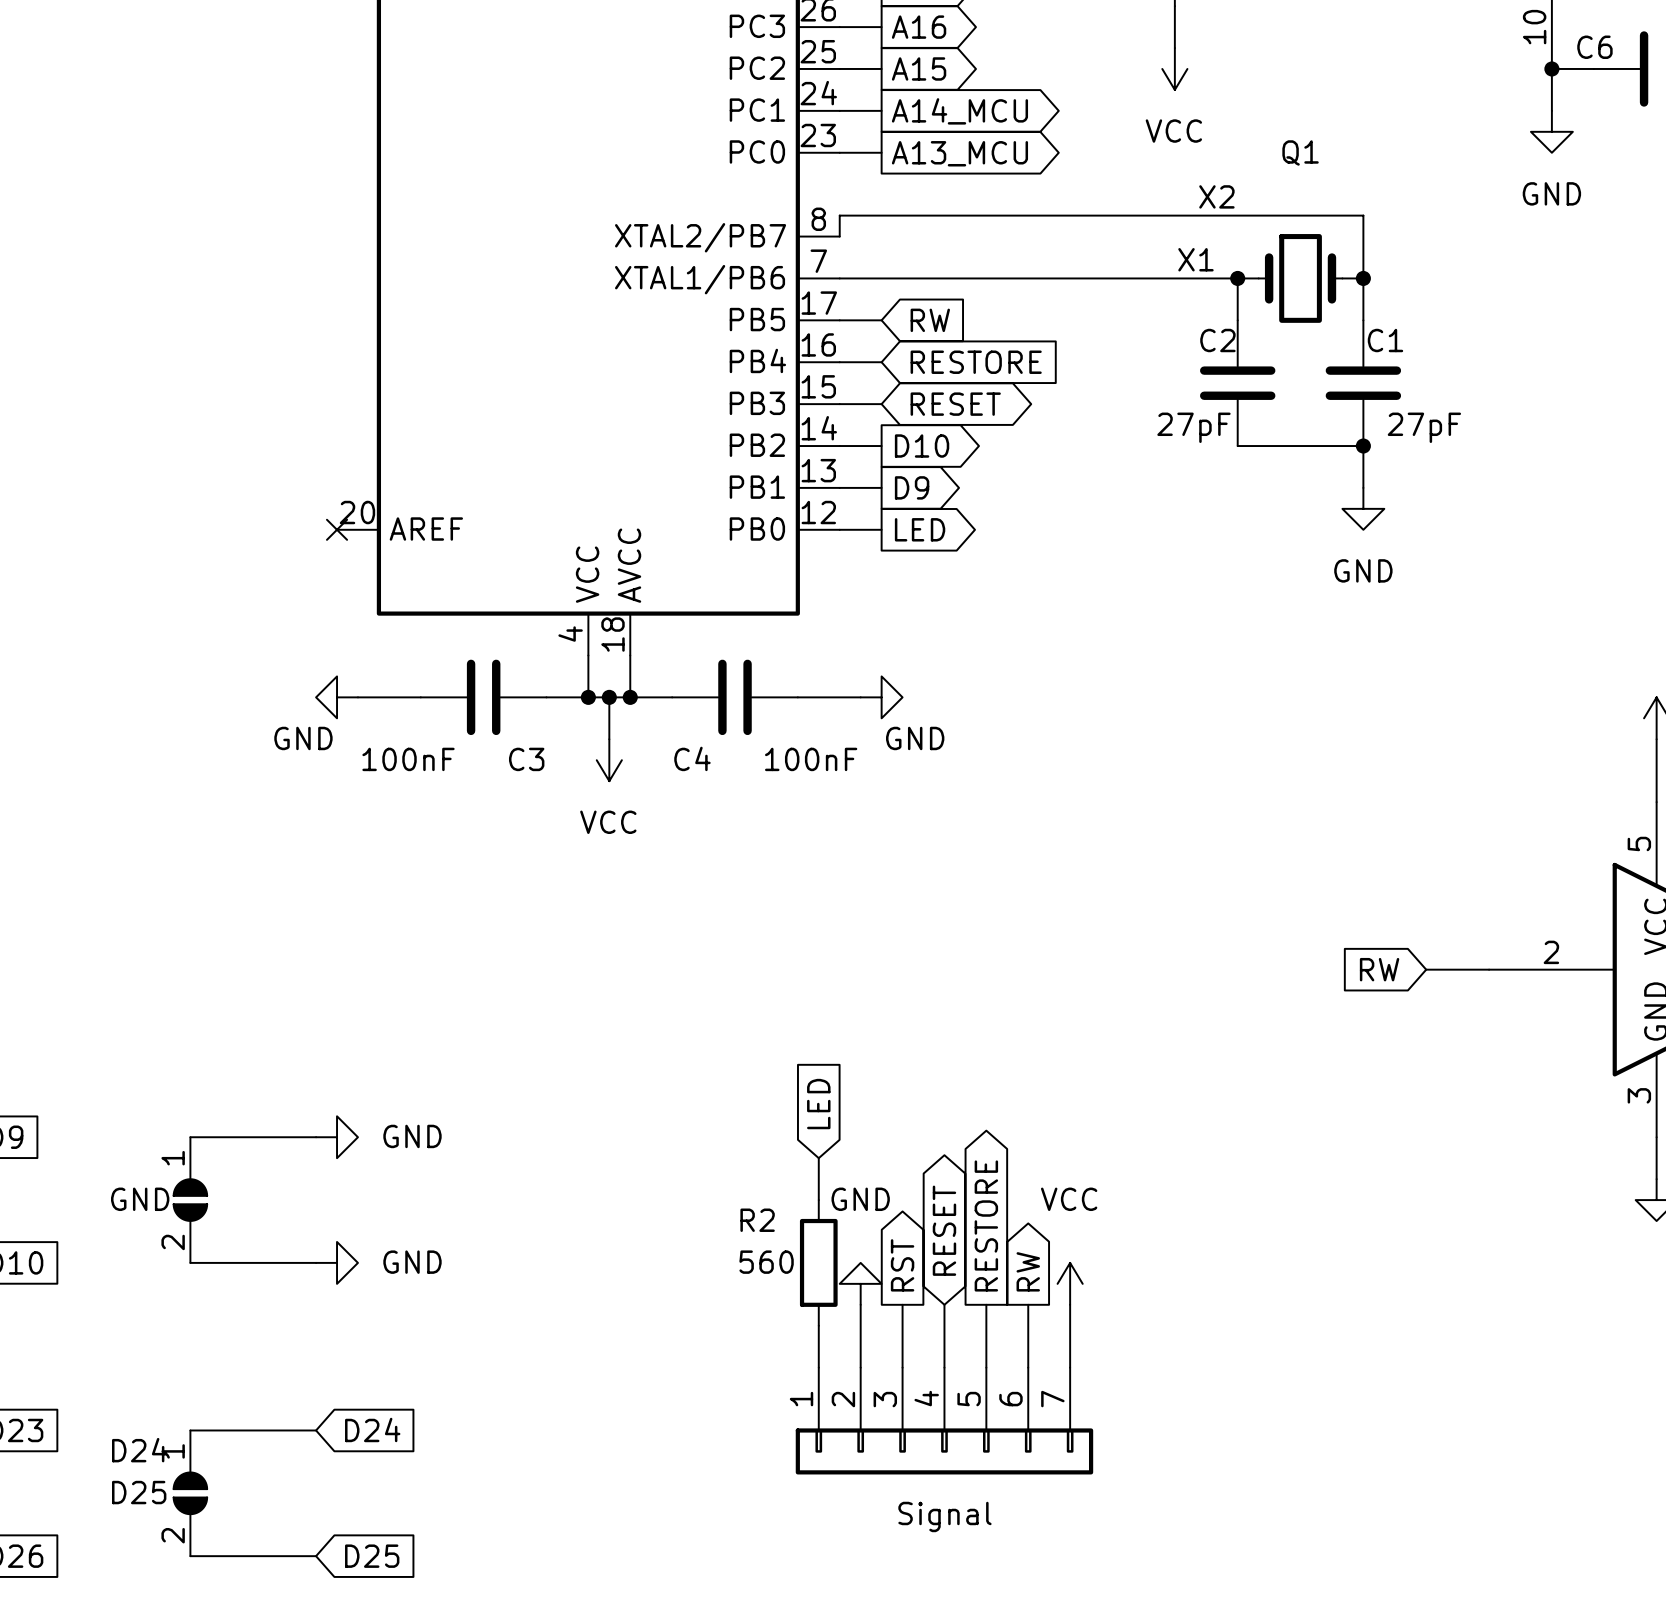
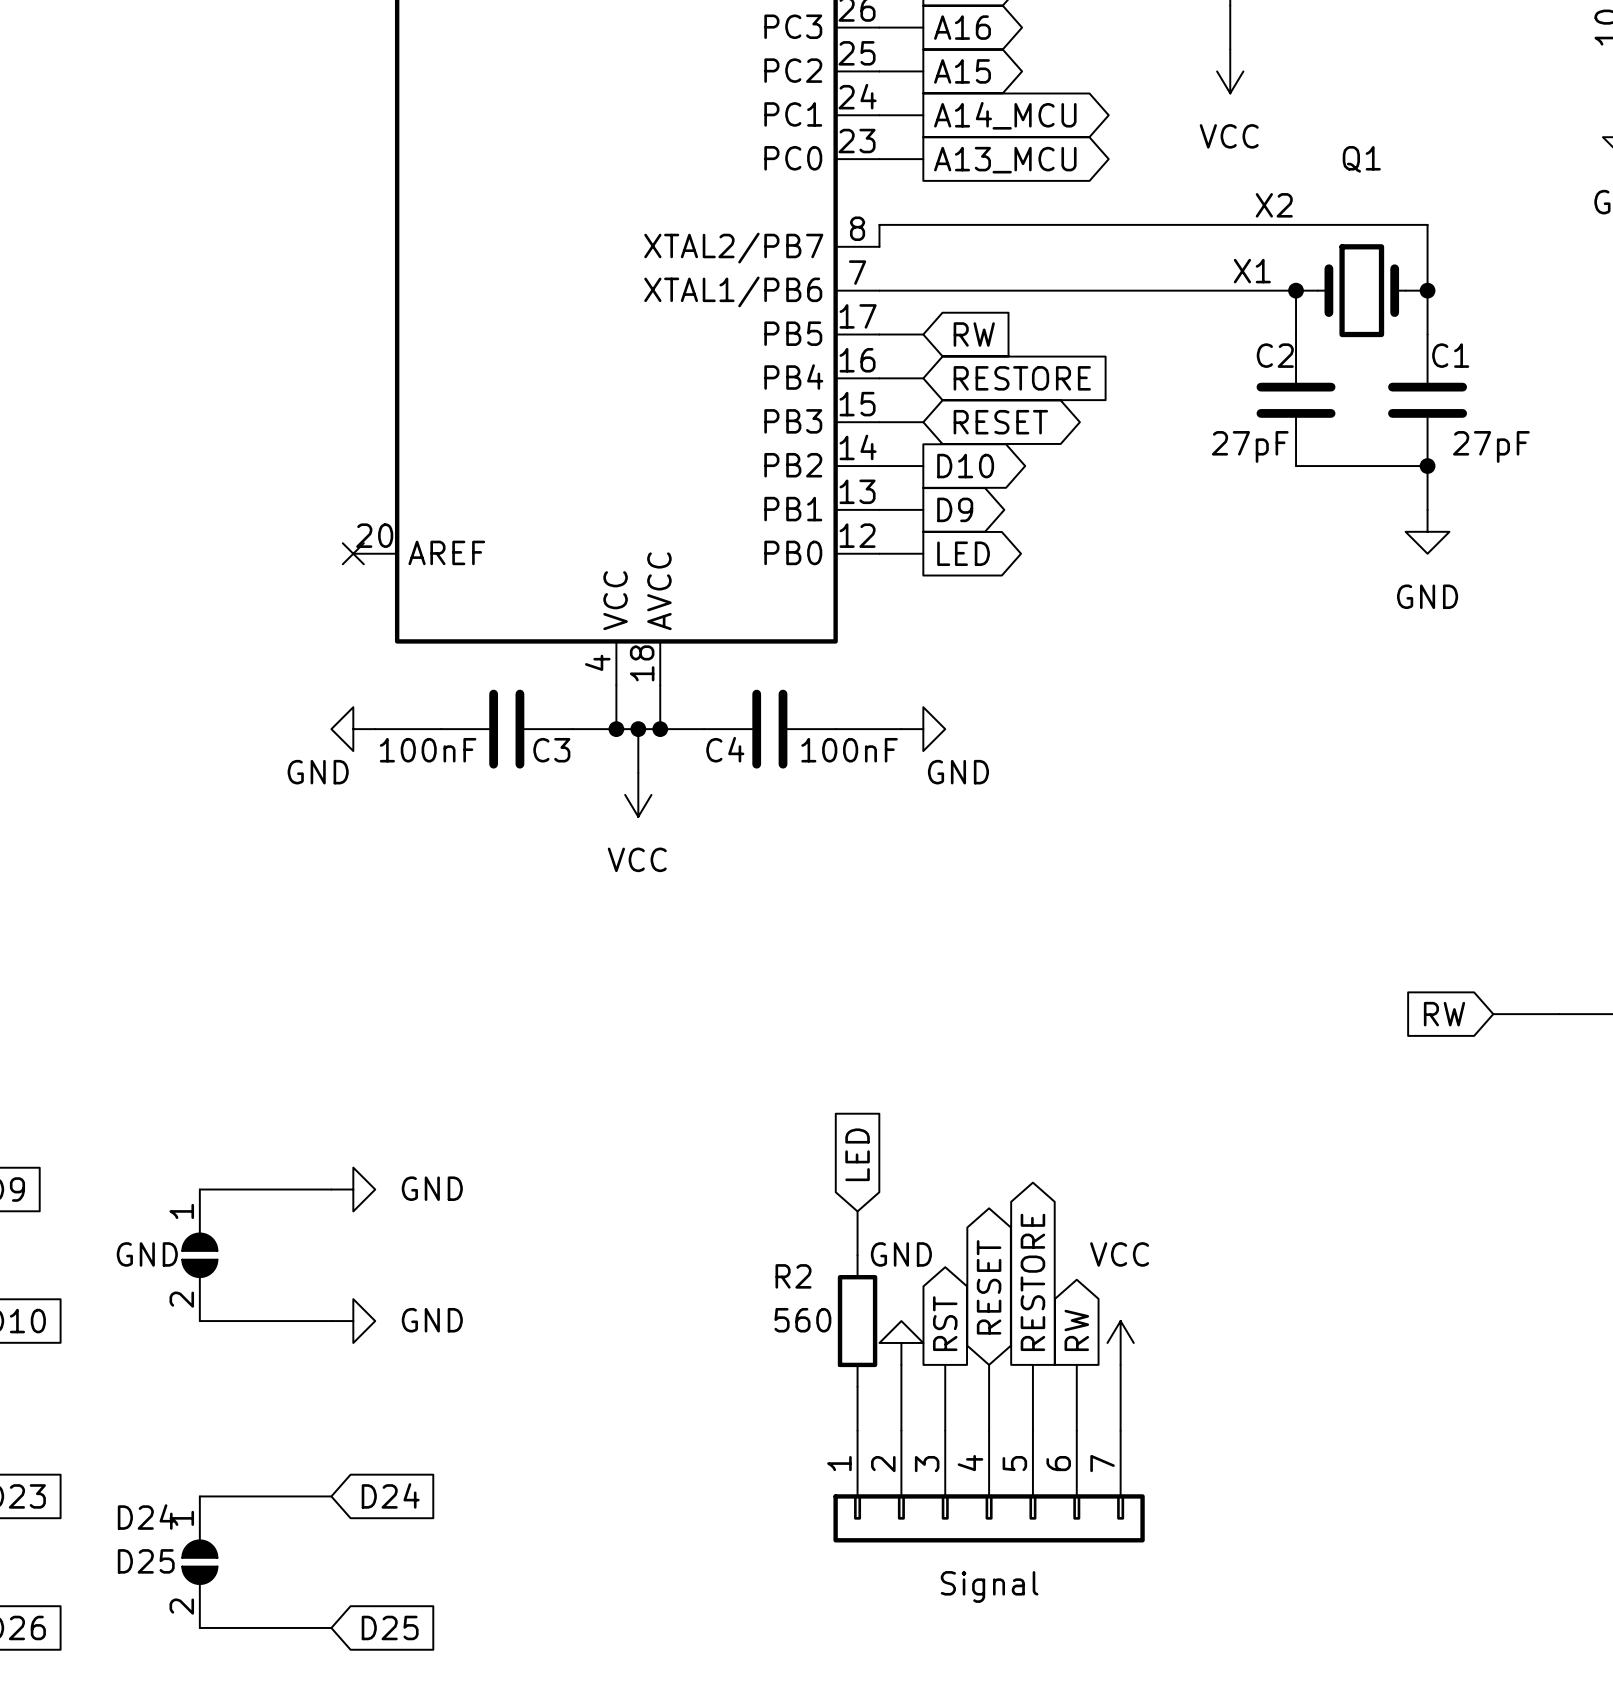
C4 name position: C4 (692, 758) -> C4 (725, 749)
C3 value position: 100nF (408, 759) -> 100nF (428, 750)
C3 name position: C3 (526, 759) -> C3 (551, 750)
C4 value position: 100nF (811, 759) -> 100nF (849, 750)

